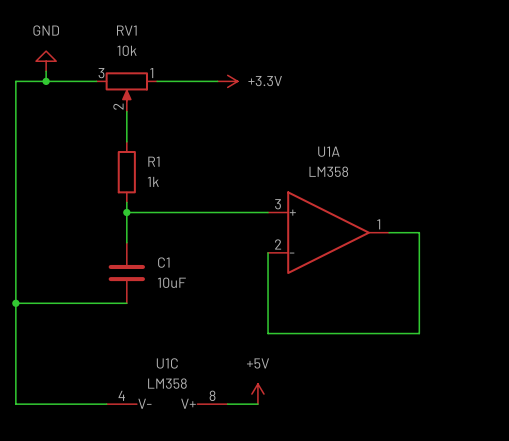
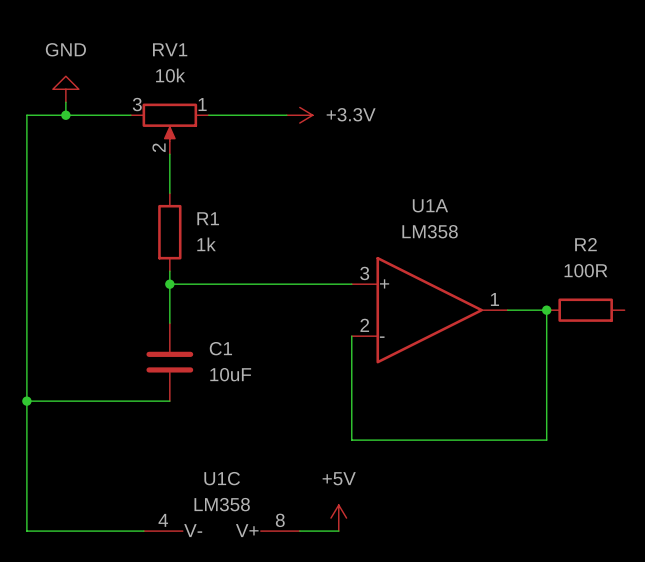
junction: none -> (546, 310)
R2: none -> 100R (585, 310)

